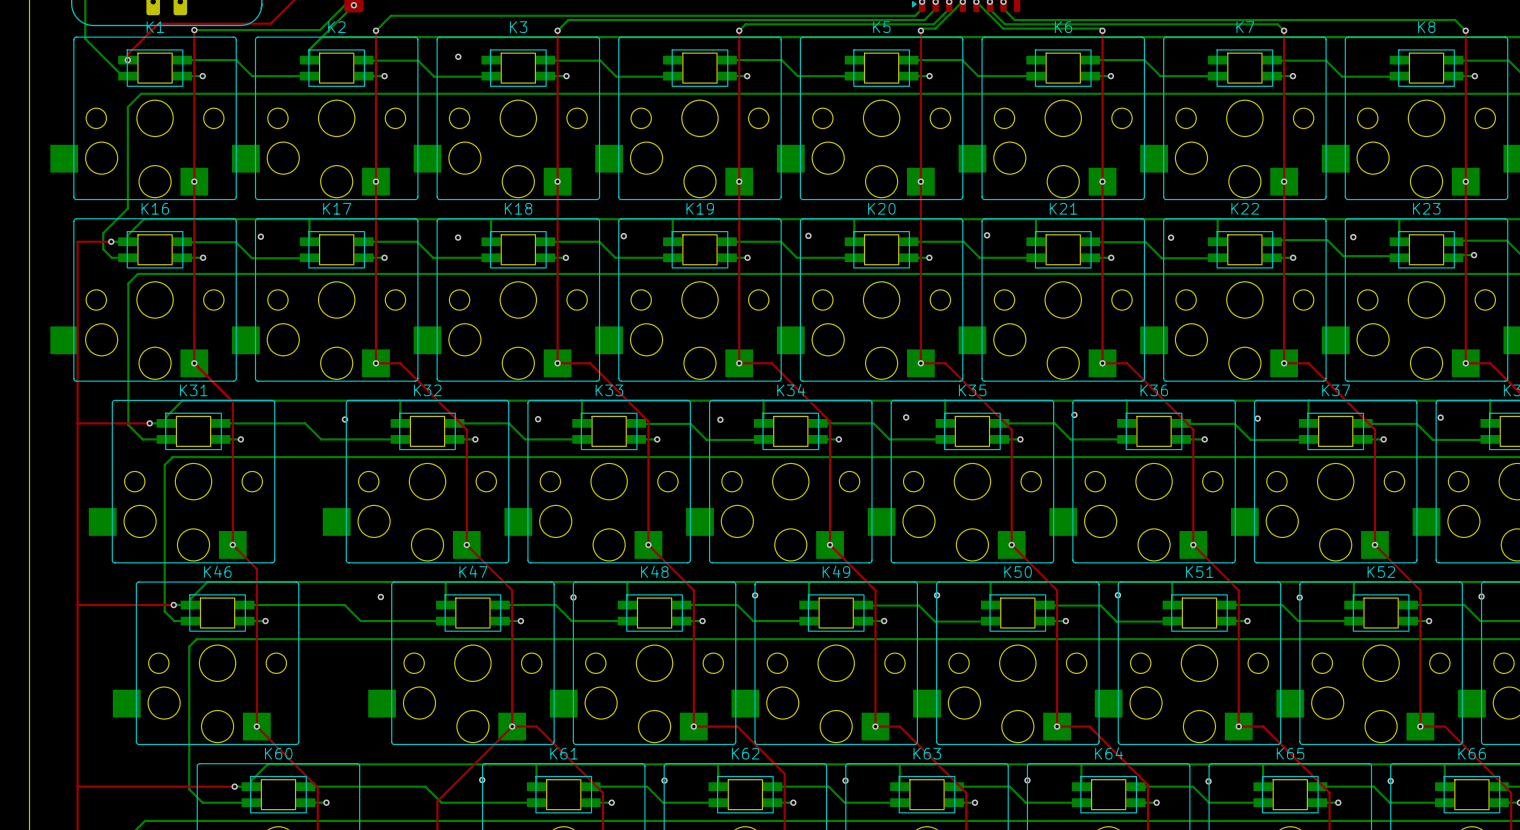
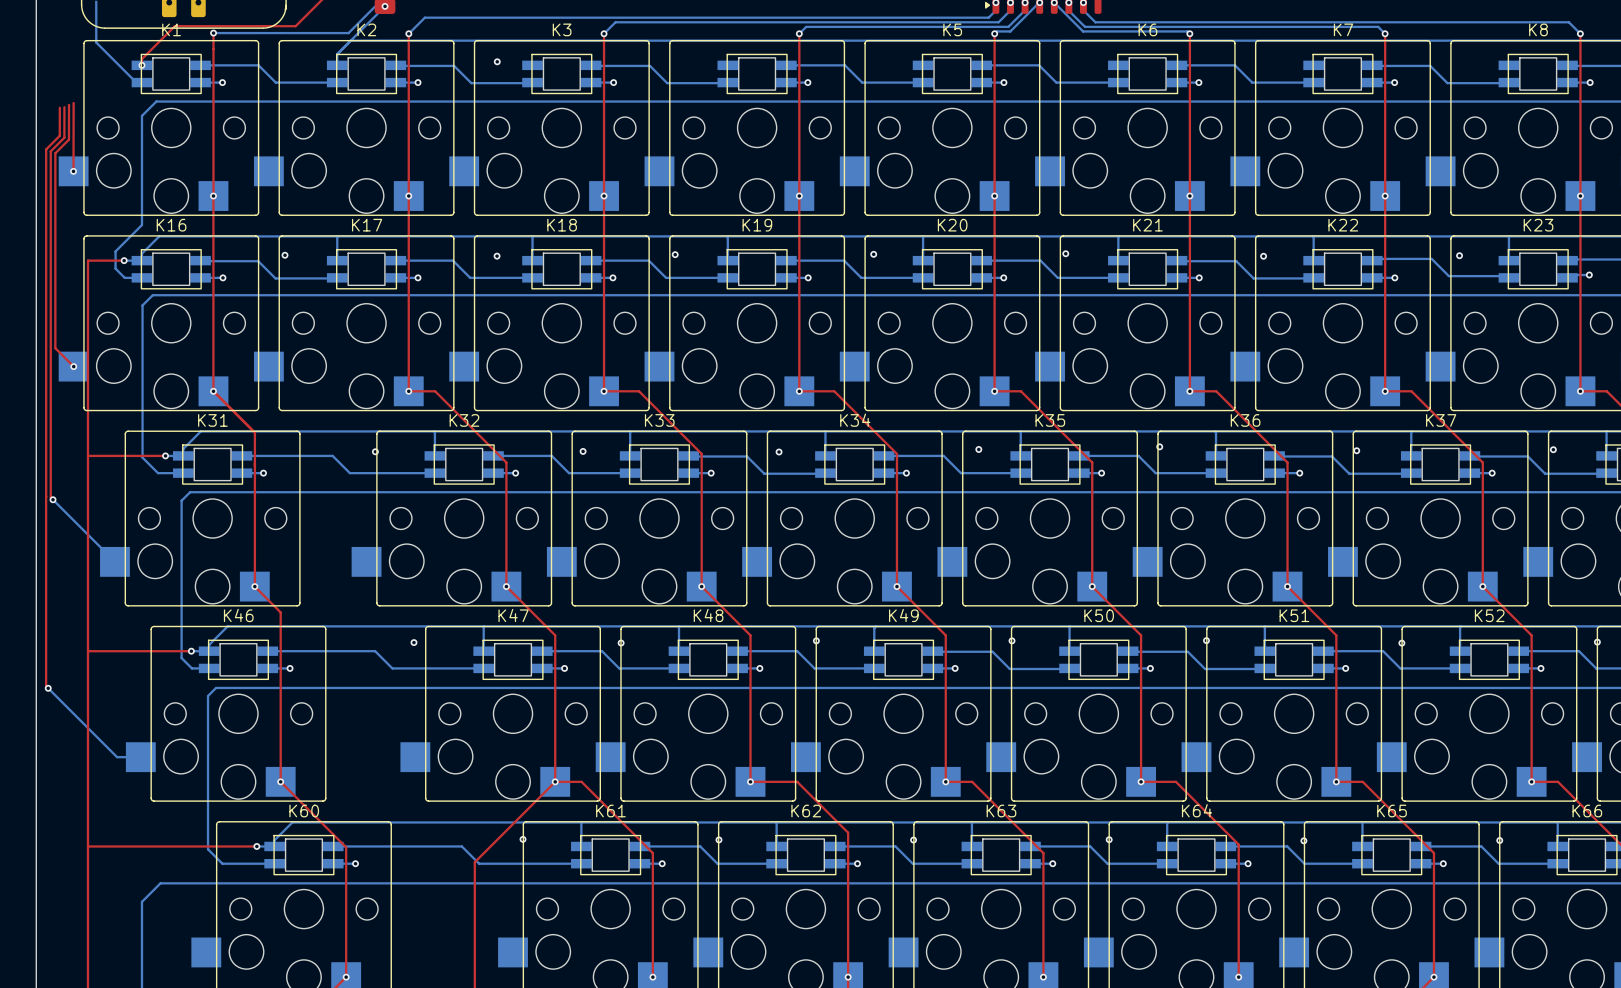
top track: none -> (73, 103) (73, 171)
top track: none -> (69, 104) (68, 139) (55, 153) (55, 348) (73, 366)
top track: none -> (59, 107) (59, 135) (46, 149) (46, 496)
top track: none -> (64, 107) (64, 137) (50, 151) (50, 497) (53, 499)
via: none -> (73, 171)
via: none -> (73, 366)
top track: none -> (46, 496) (46, 686) (48, 688)
bottom track: none -> (53, 499) (114, 561)
via: none -> (53, 499)
bottom track: none -> (48, 688) (117, 757) (140, 757)
via: none -> (48, 688)

